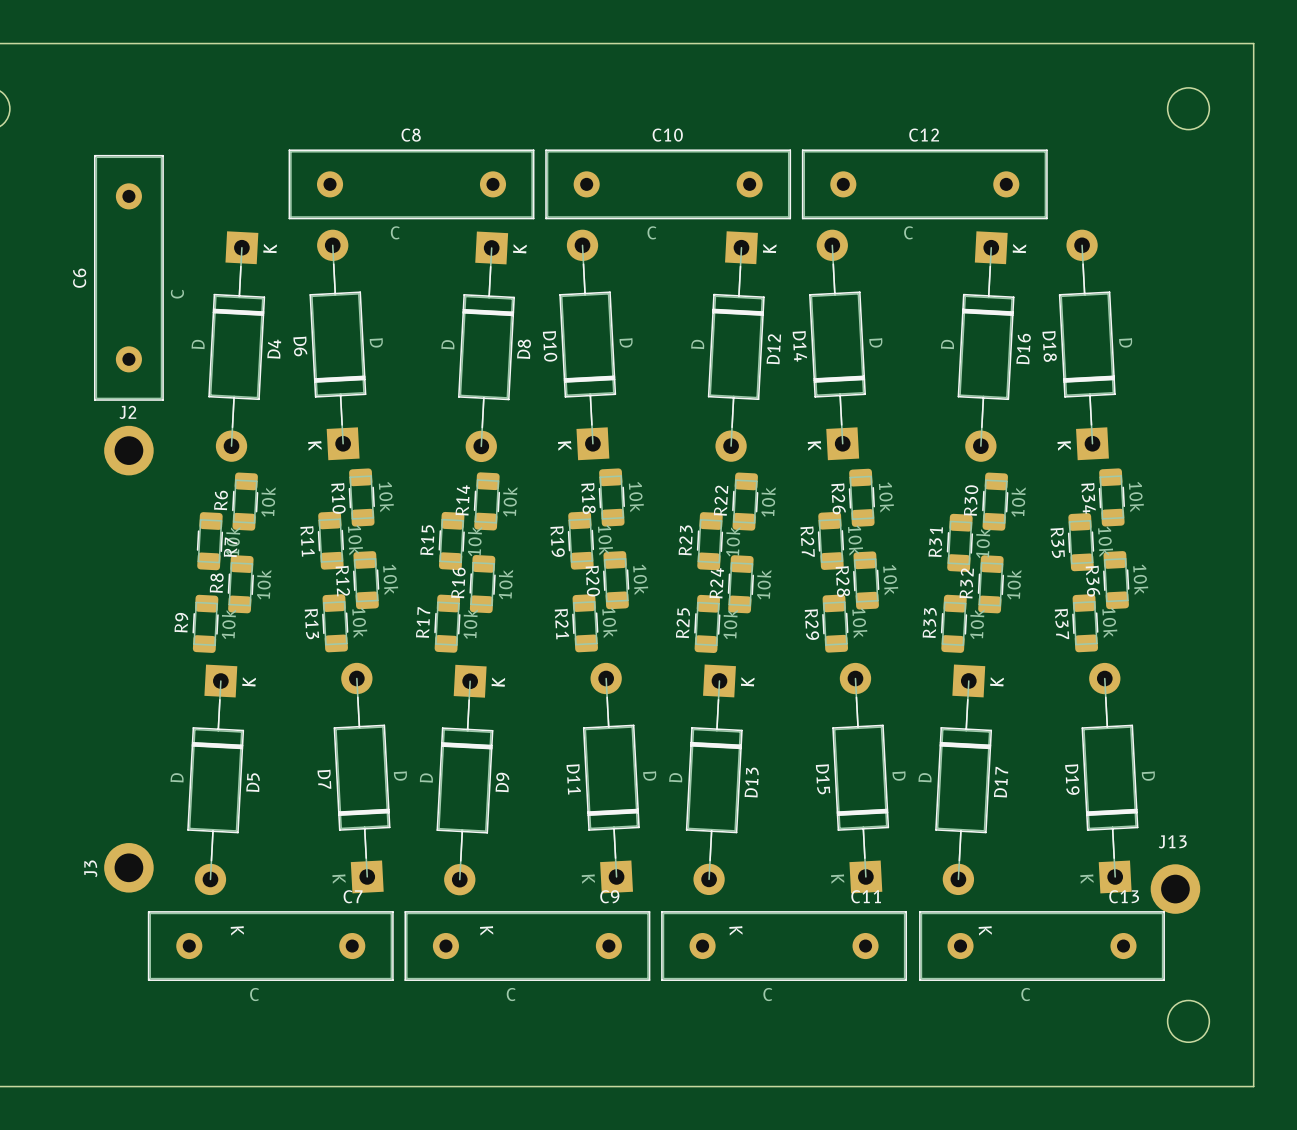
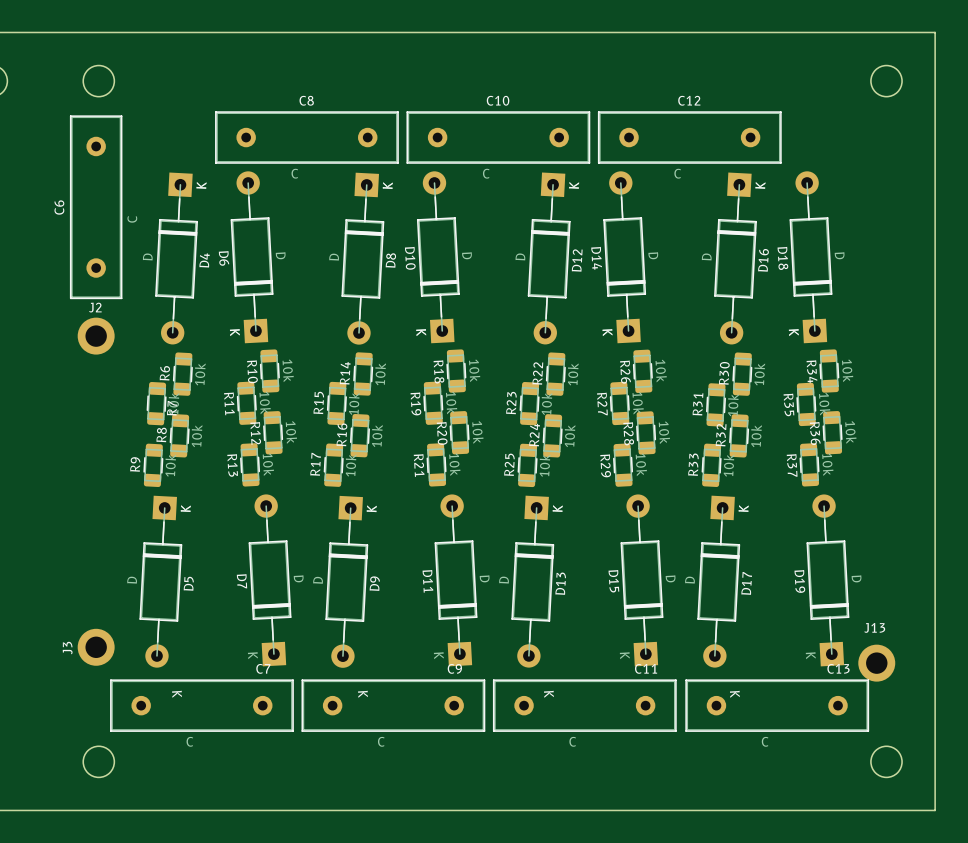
round board edge: none -> [82, 65, 115, 98]
round board edge: none -> [82, 745, 115, 778]

